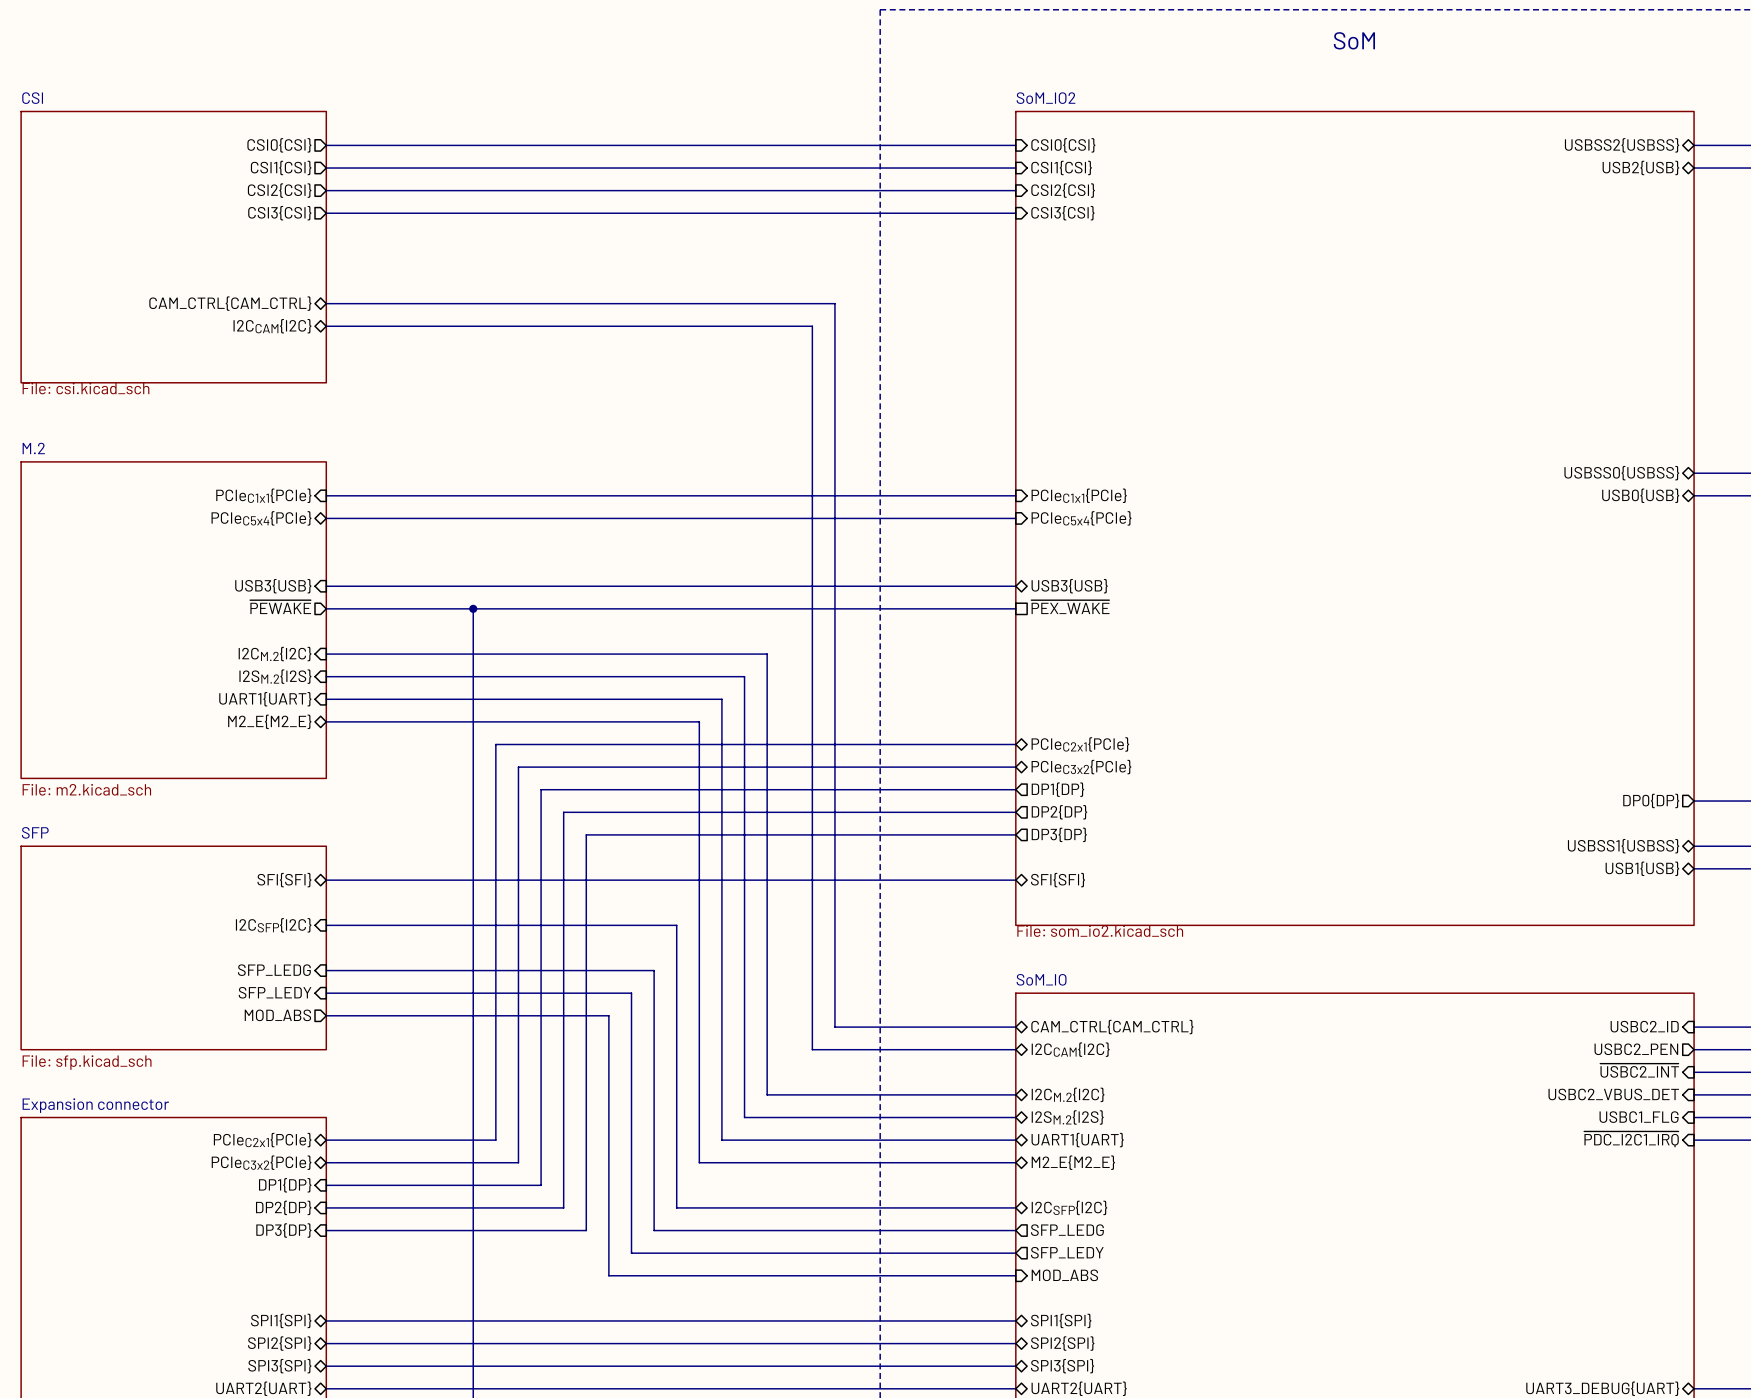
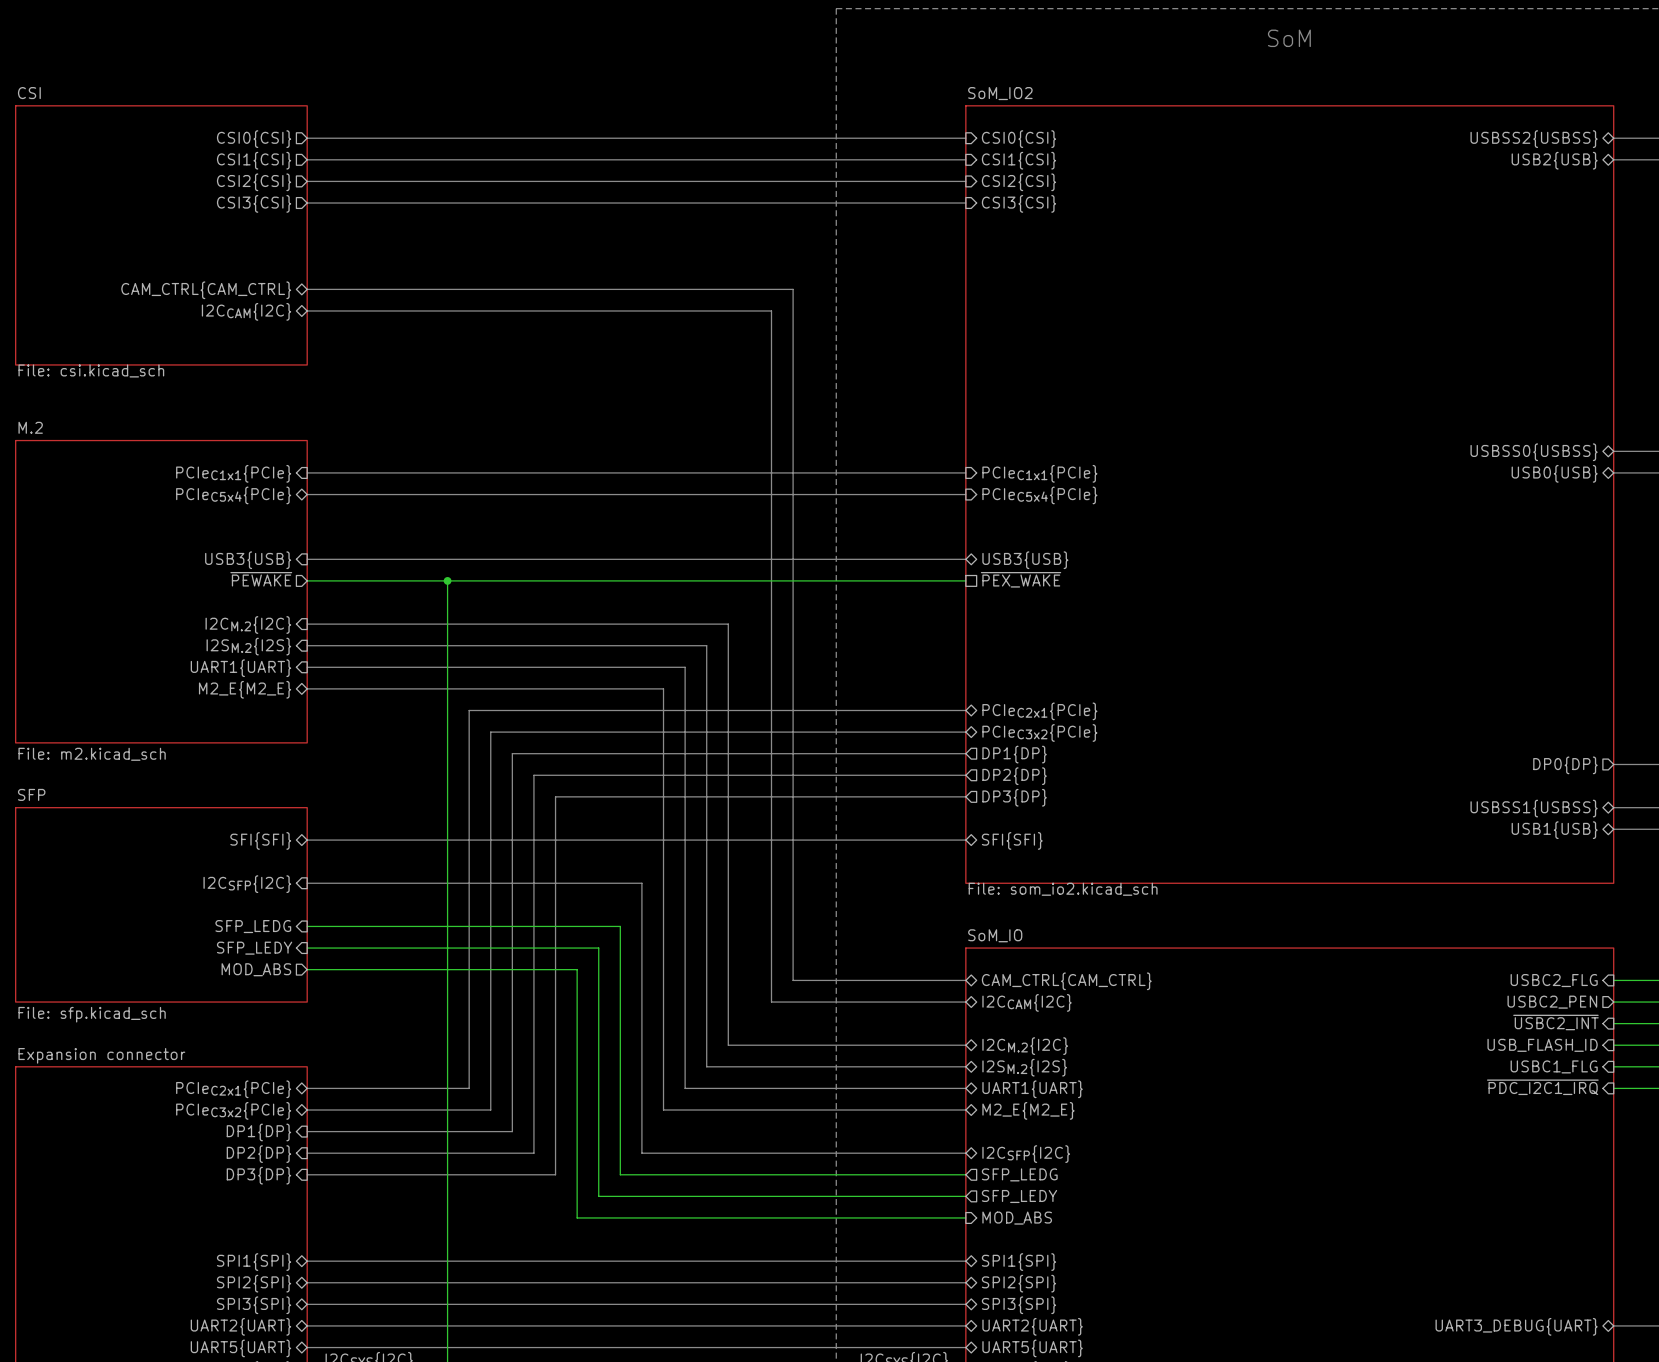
sheet pin: USBC2_ID (1644, 1026) -> USBC2_FLG (1554, 980)
sheet pin: USBC2_VBUS_DET (1613, 1094) -> USB_FLASH_ID (1542, 1045)

